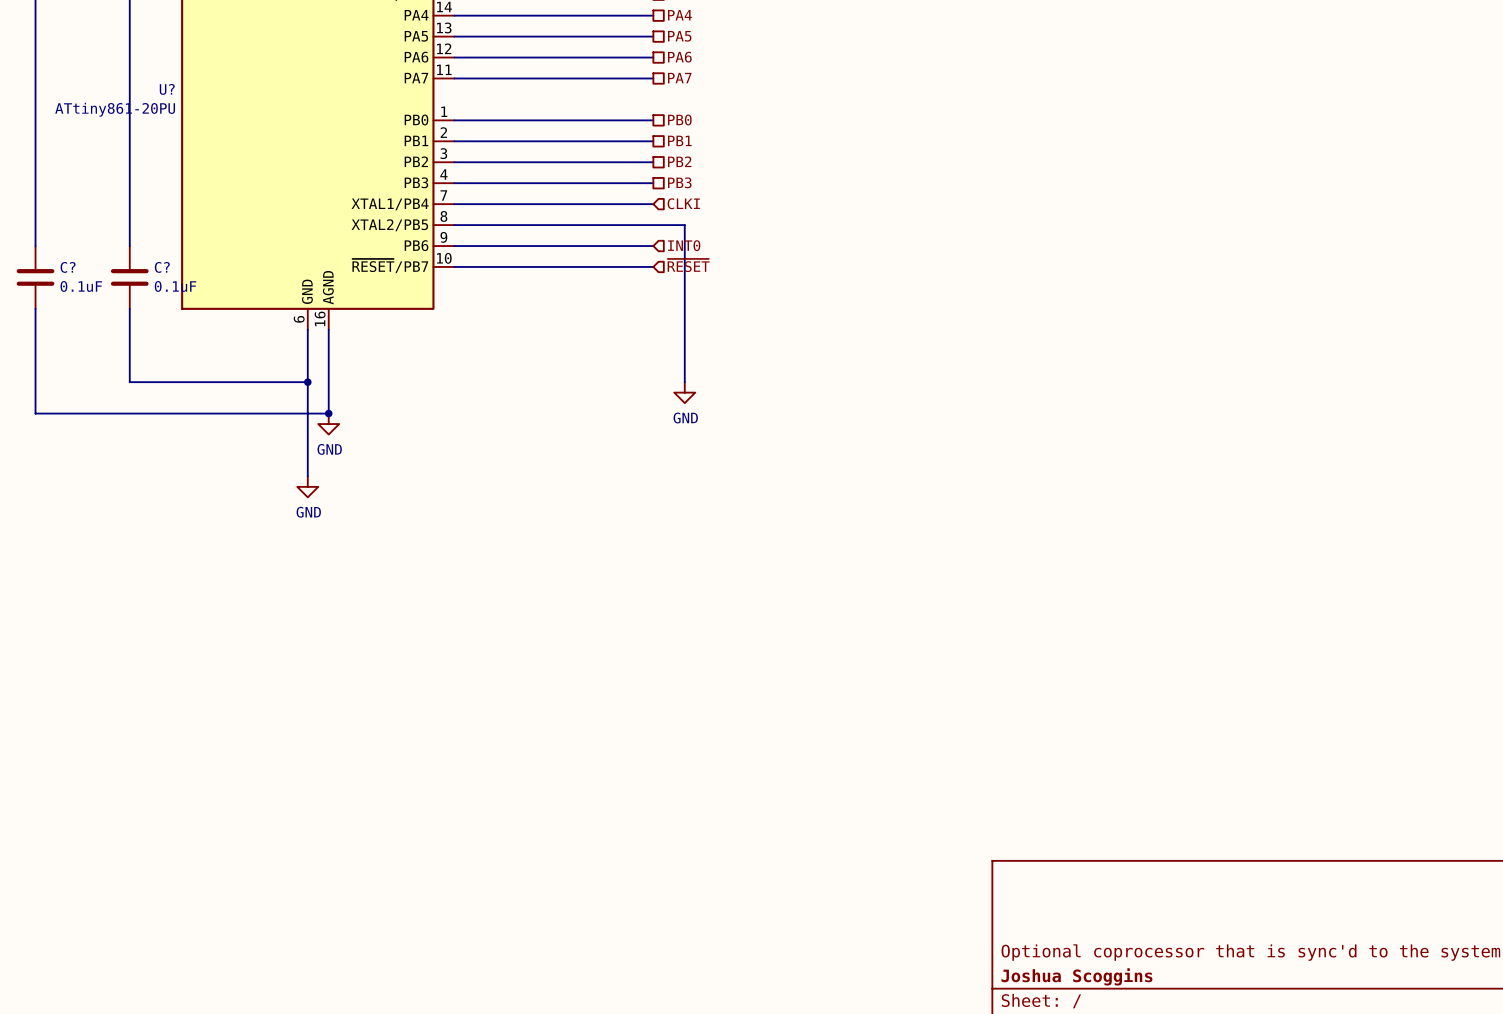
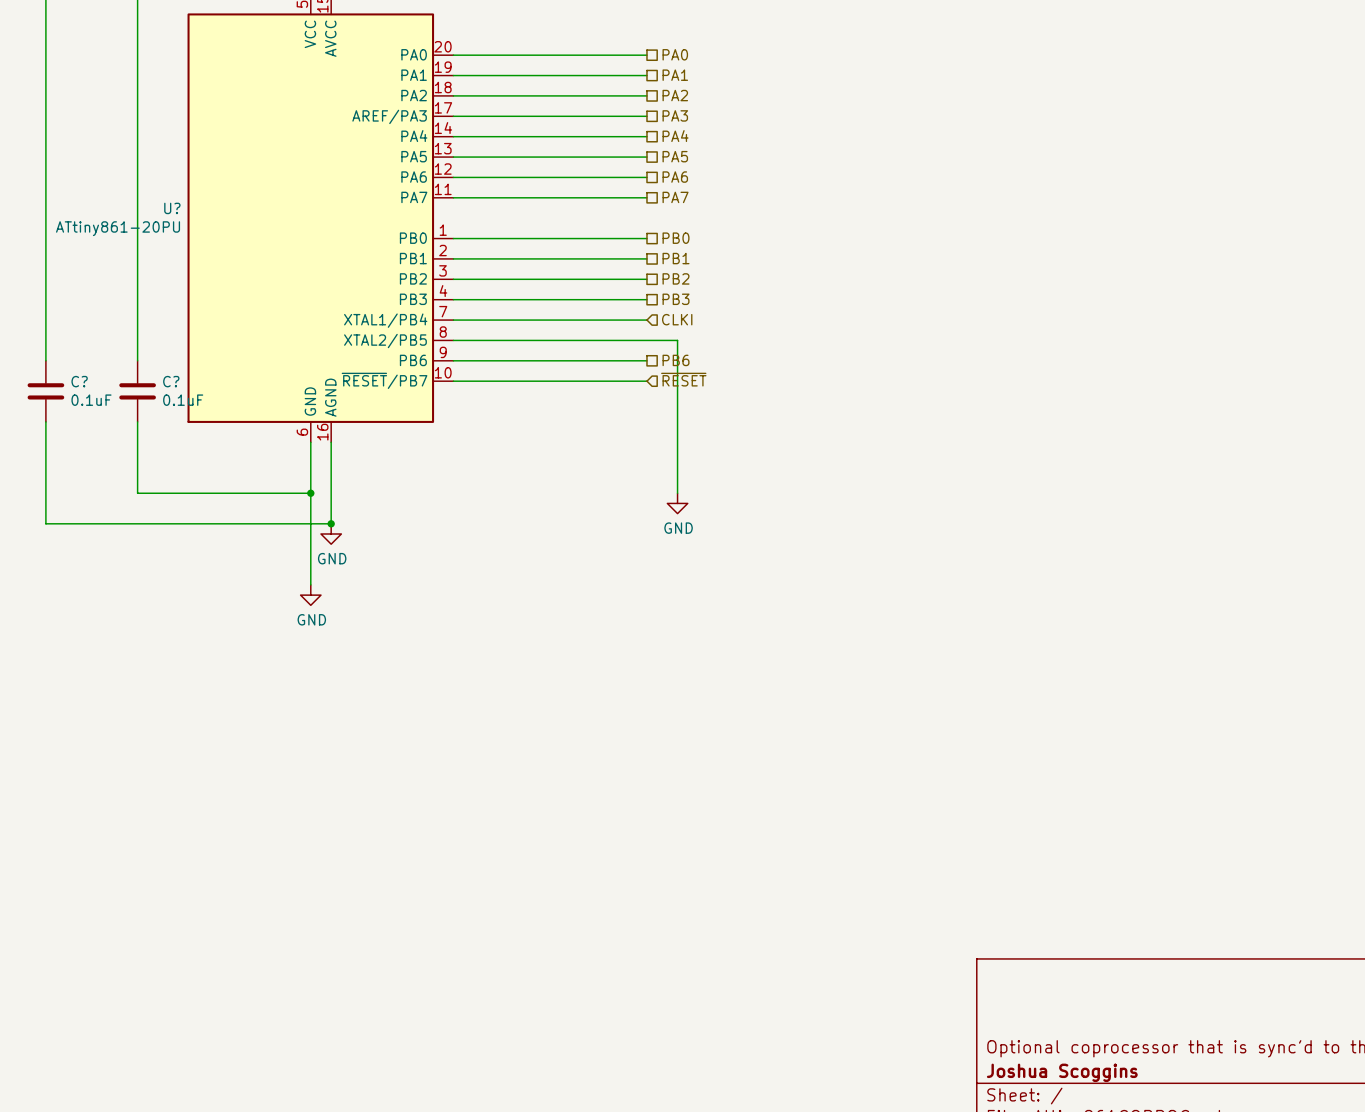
hierarchical label shape: input (684, 245) -> passive (676, 360)
hierarchical label: INT0 (684, 245) -> PB6 (676, 360)

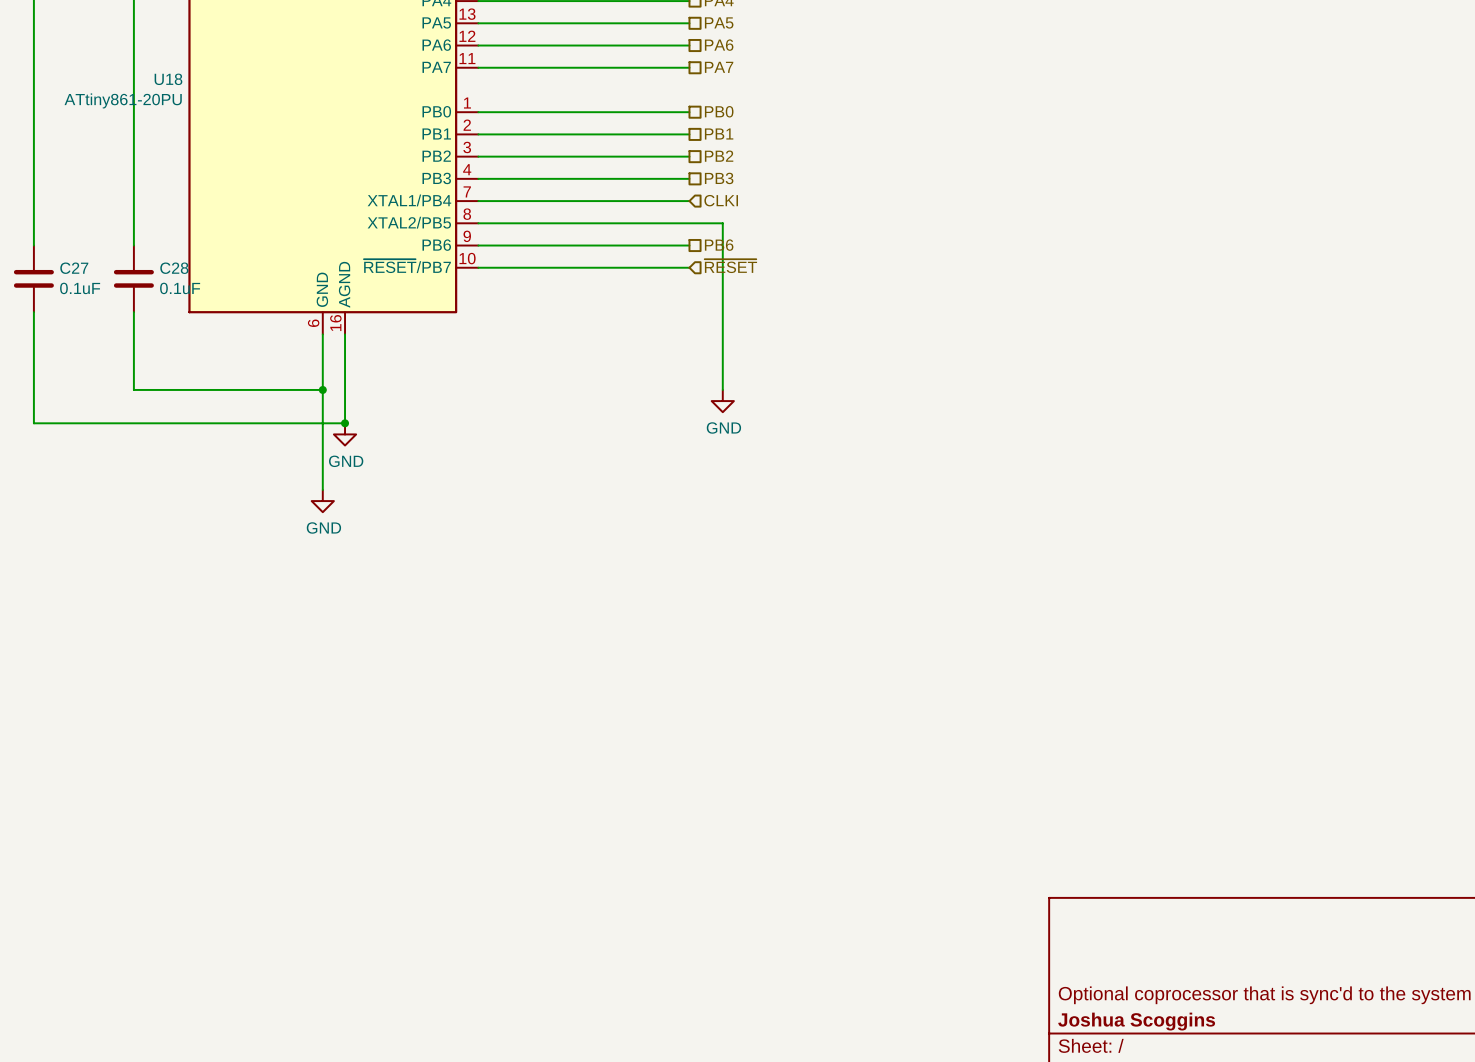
U? name: U? (172, 208) -> U18 (168, 79)
C? name: C? (79, 381) -> C27 (74, 268)
C? name: C? (171, 381) -> C28 (174, 268)

